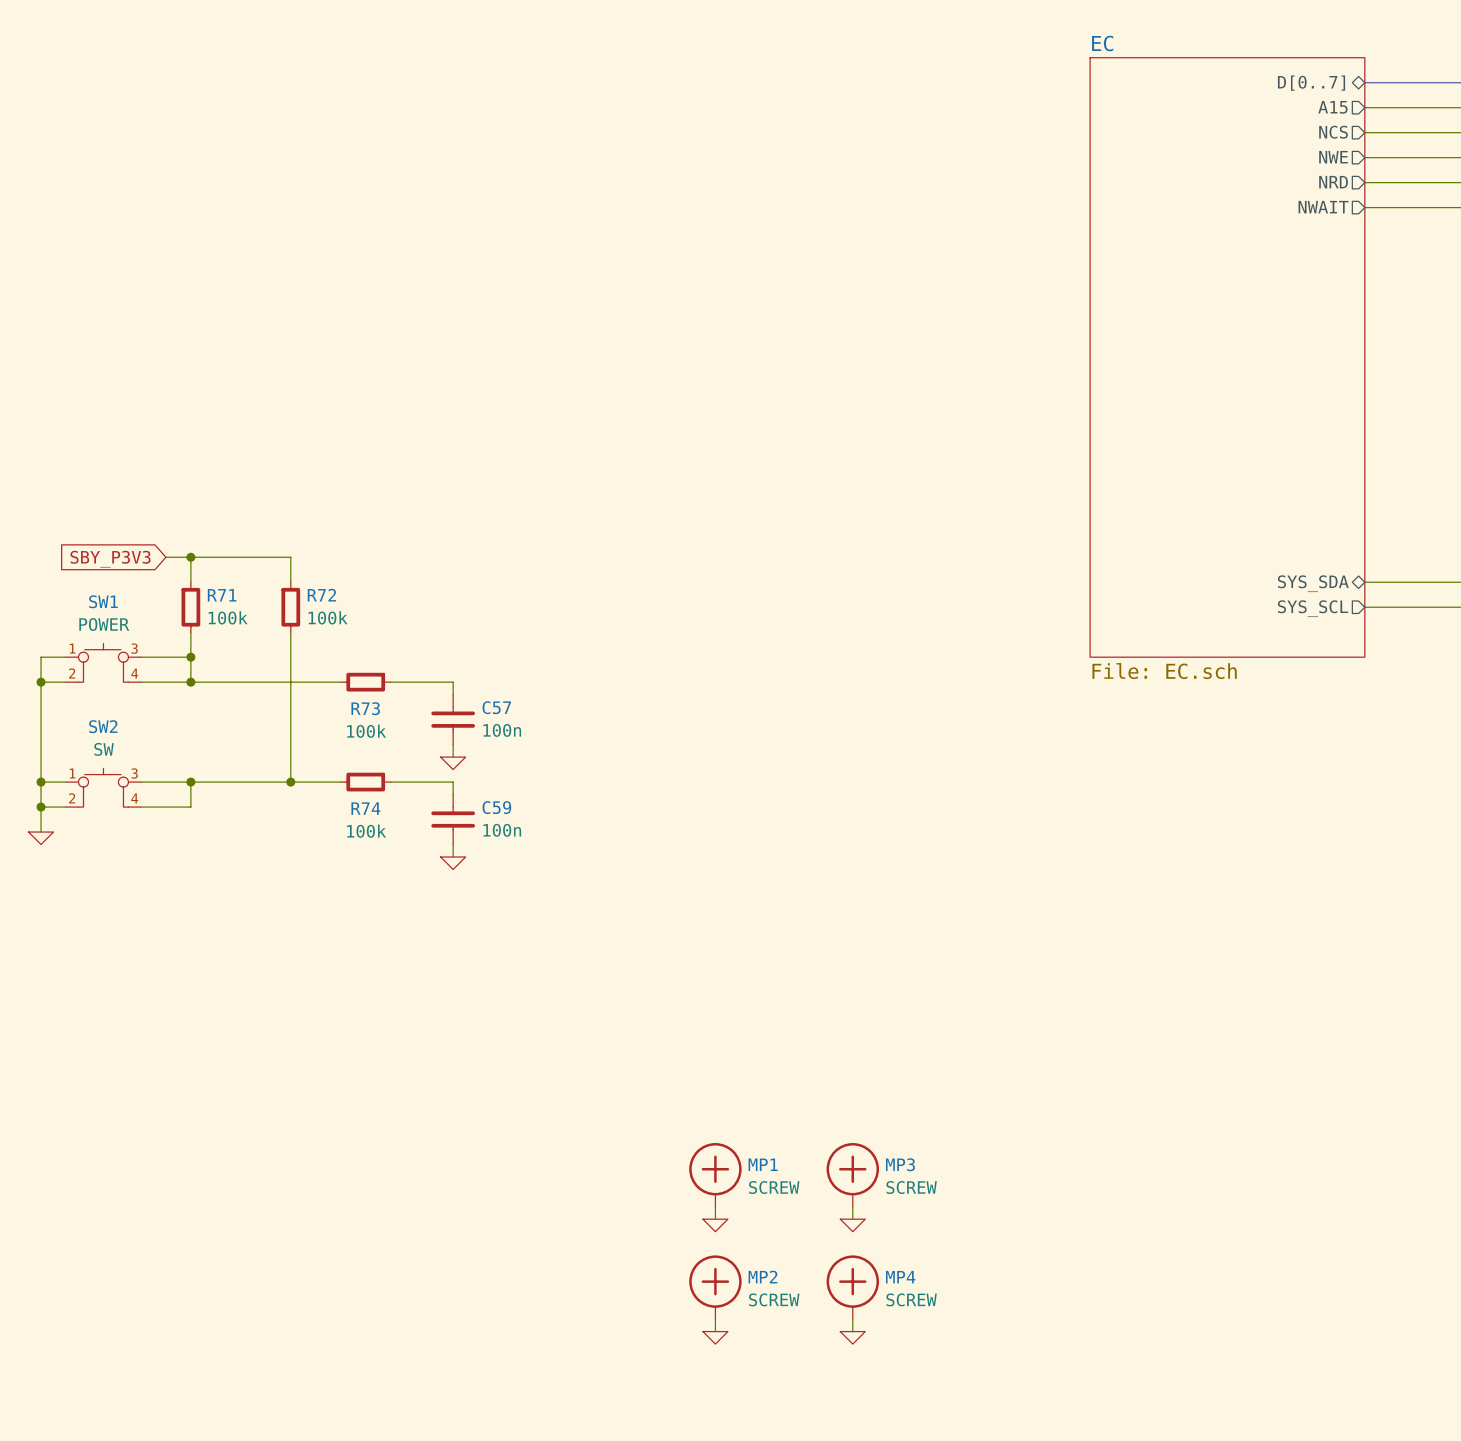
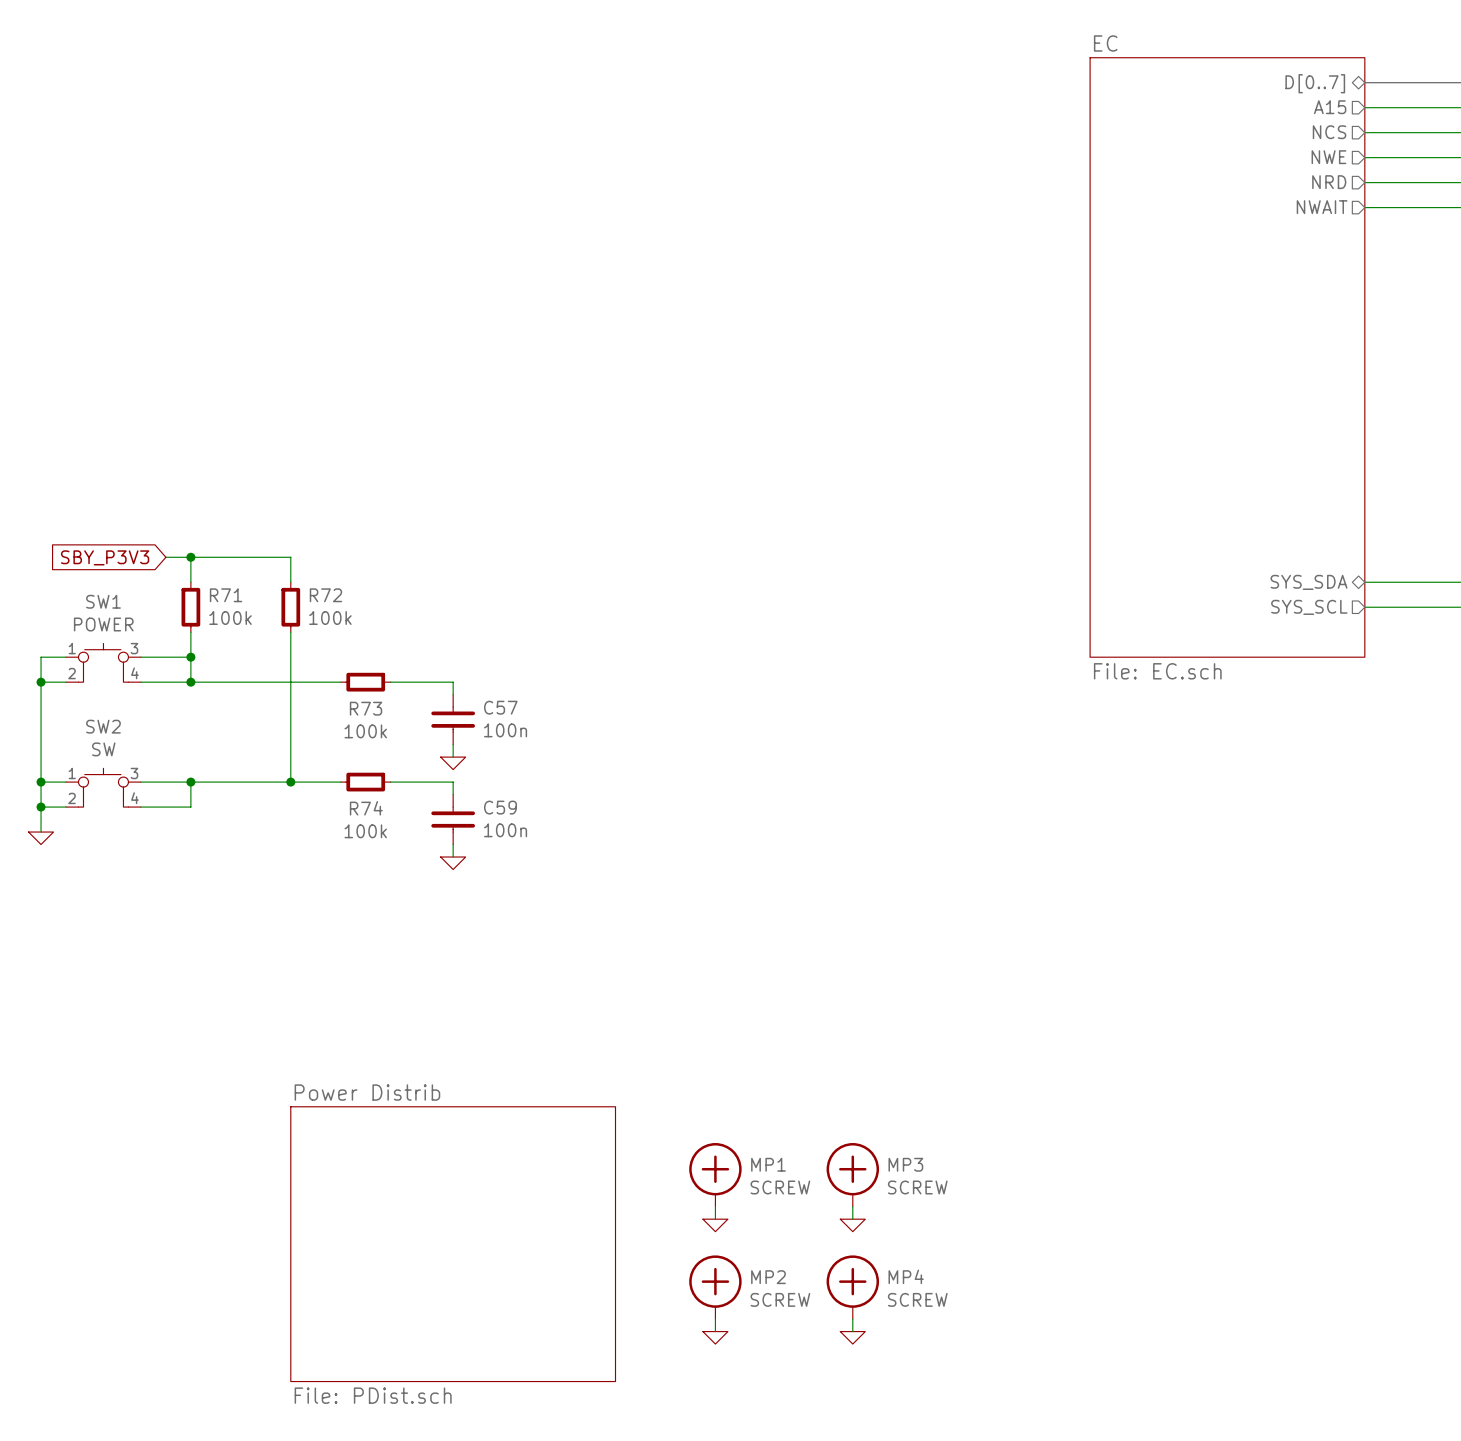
sheet Power Distrib: none -> File: PDist.sch (453, 1244)

